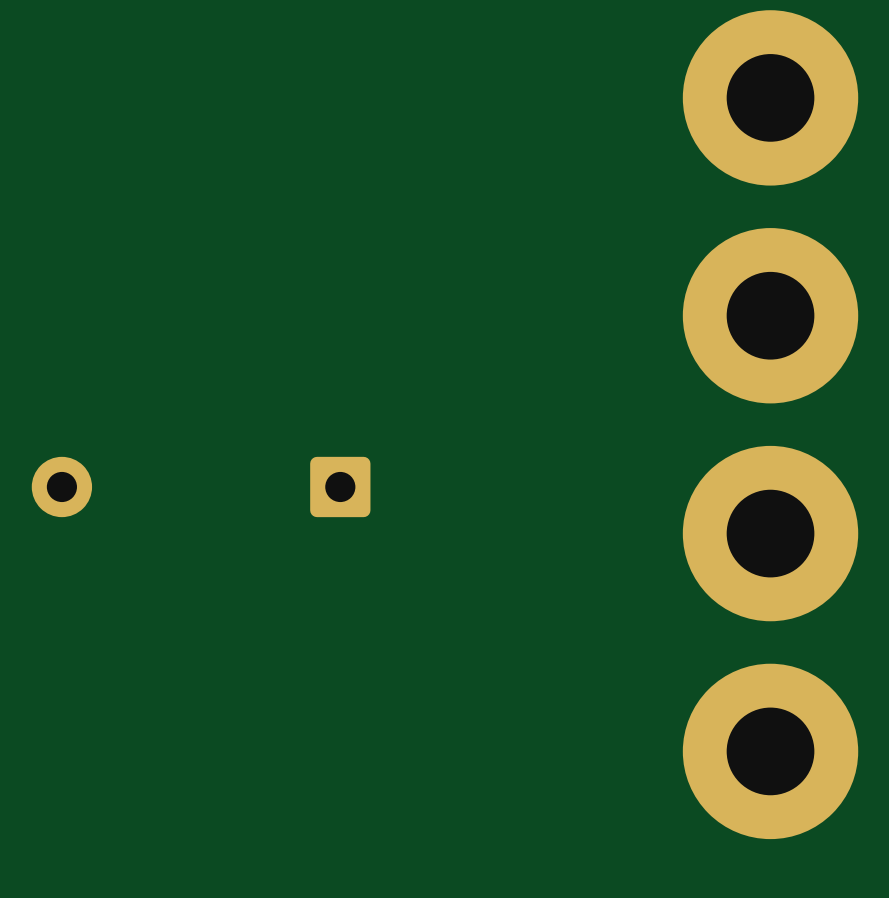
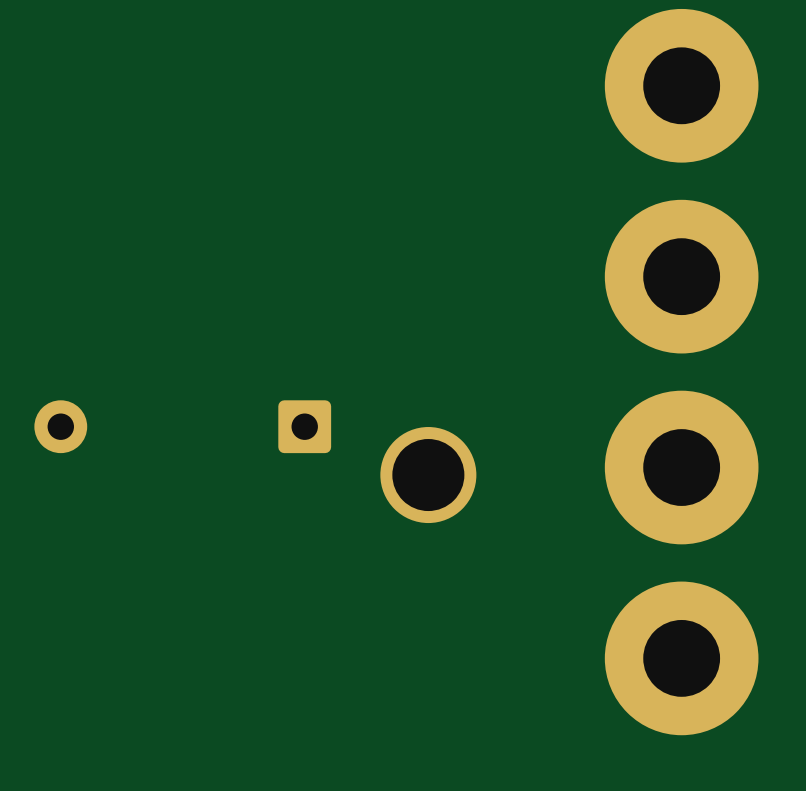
part: none -> (428, 475)

